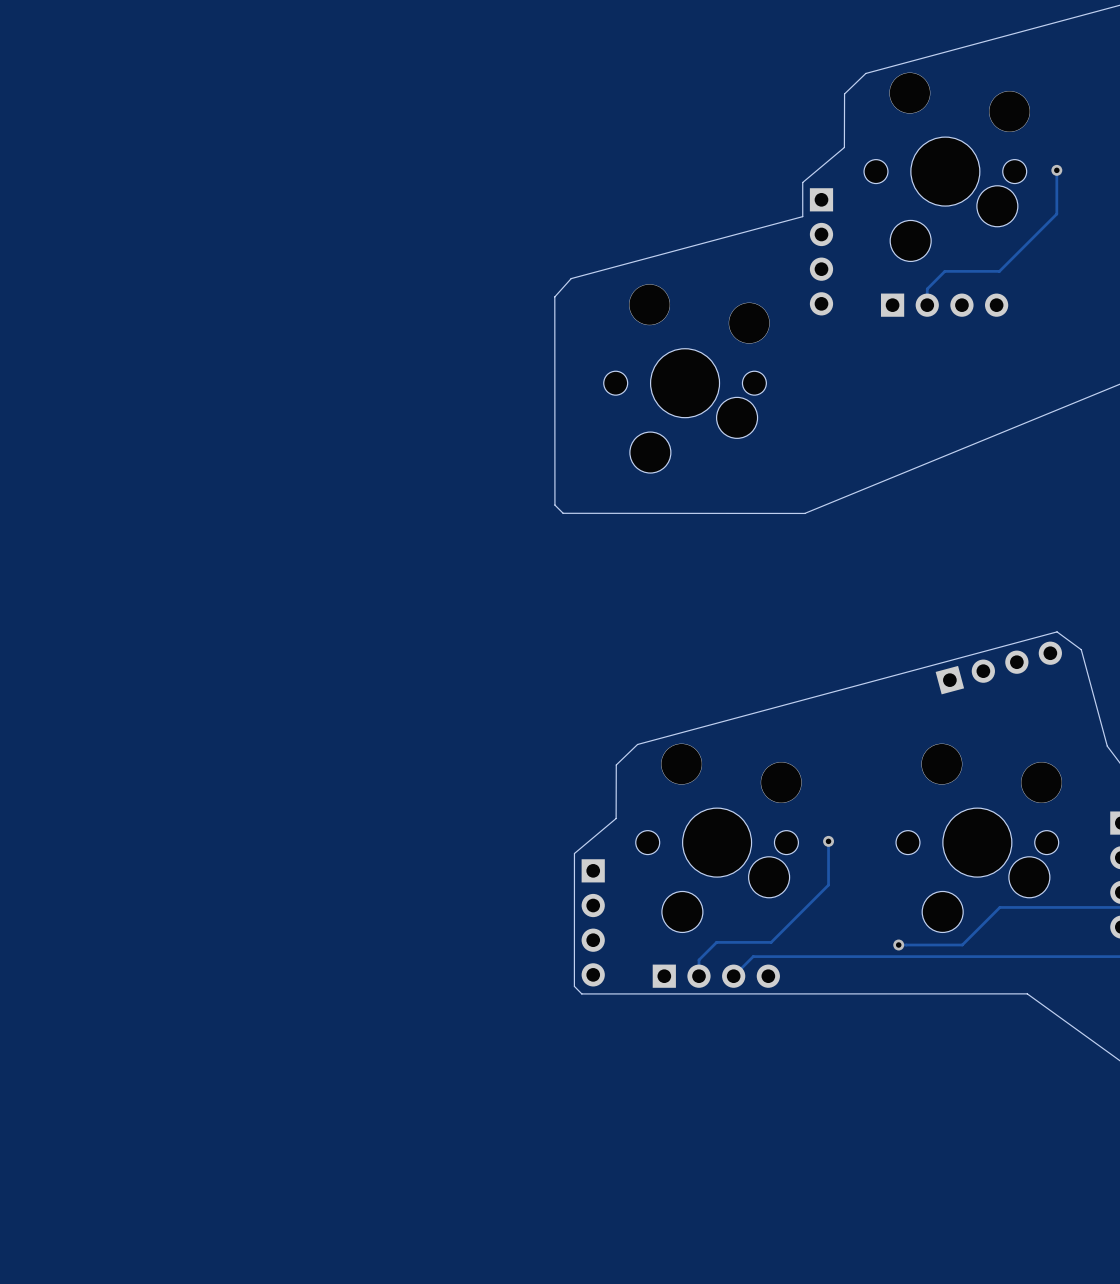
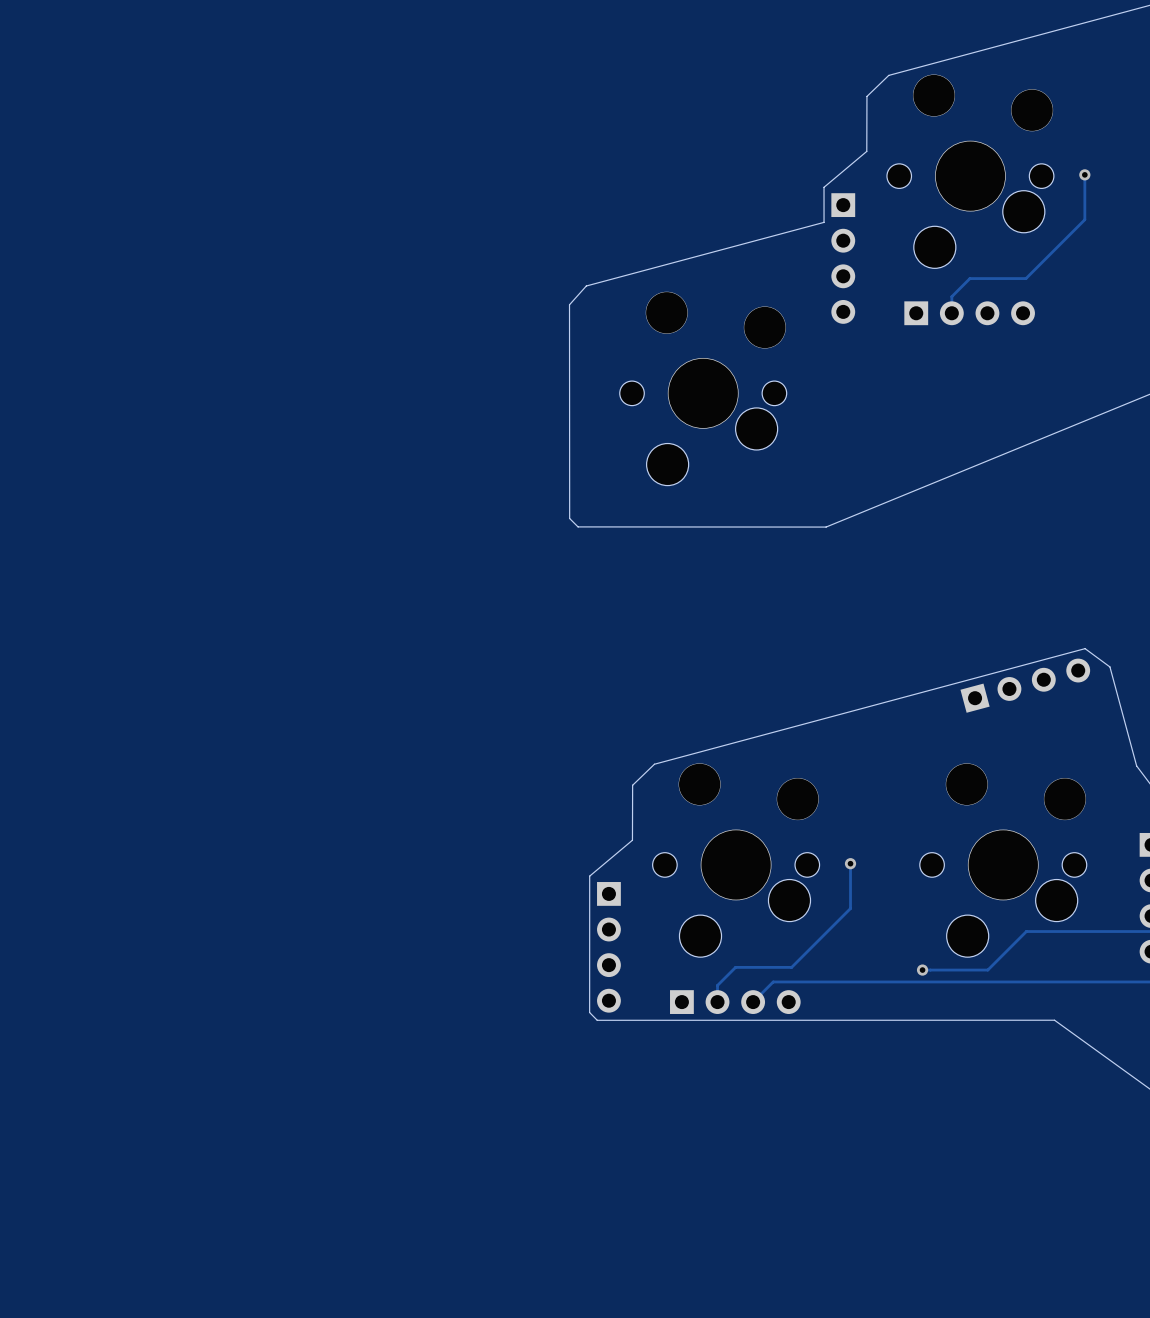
part footprint: [864, 72, 1031, 262] -> [886, 74, 1054, 269]
part footprint: [603, 284, 770, 474] -> [619, 291, 787, 486]
part footprint: [635, 743, 802, 933] -> [652, 763, 820, 958]
part footprint: [896, 743, 1063, 933] -> [919, 763, 1087, 958]

